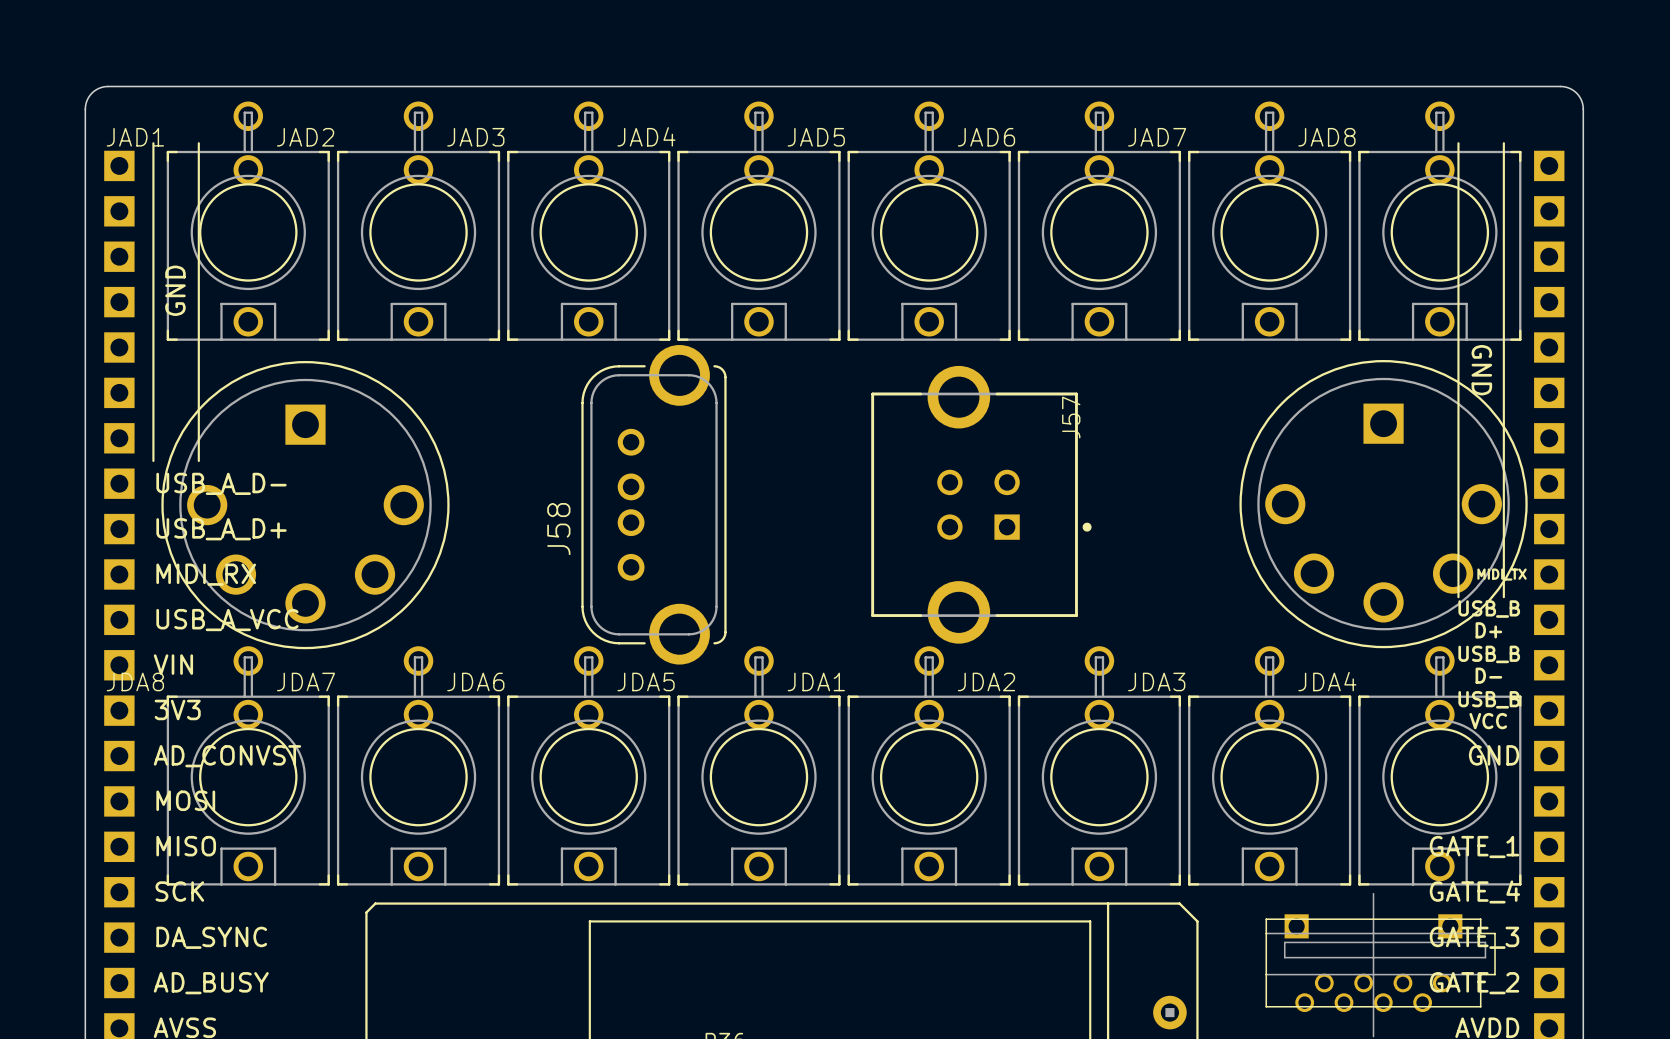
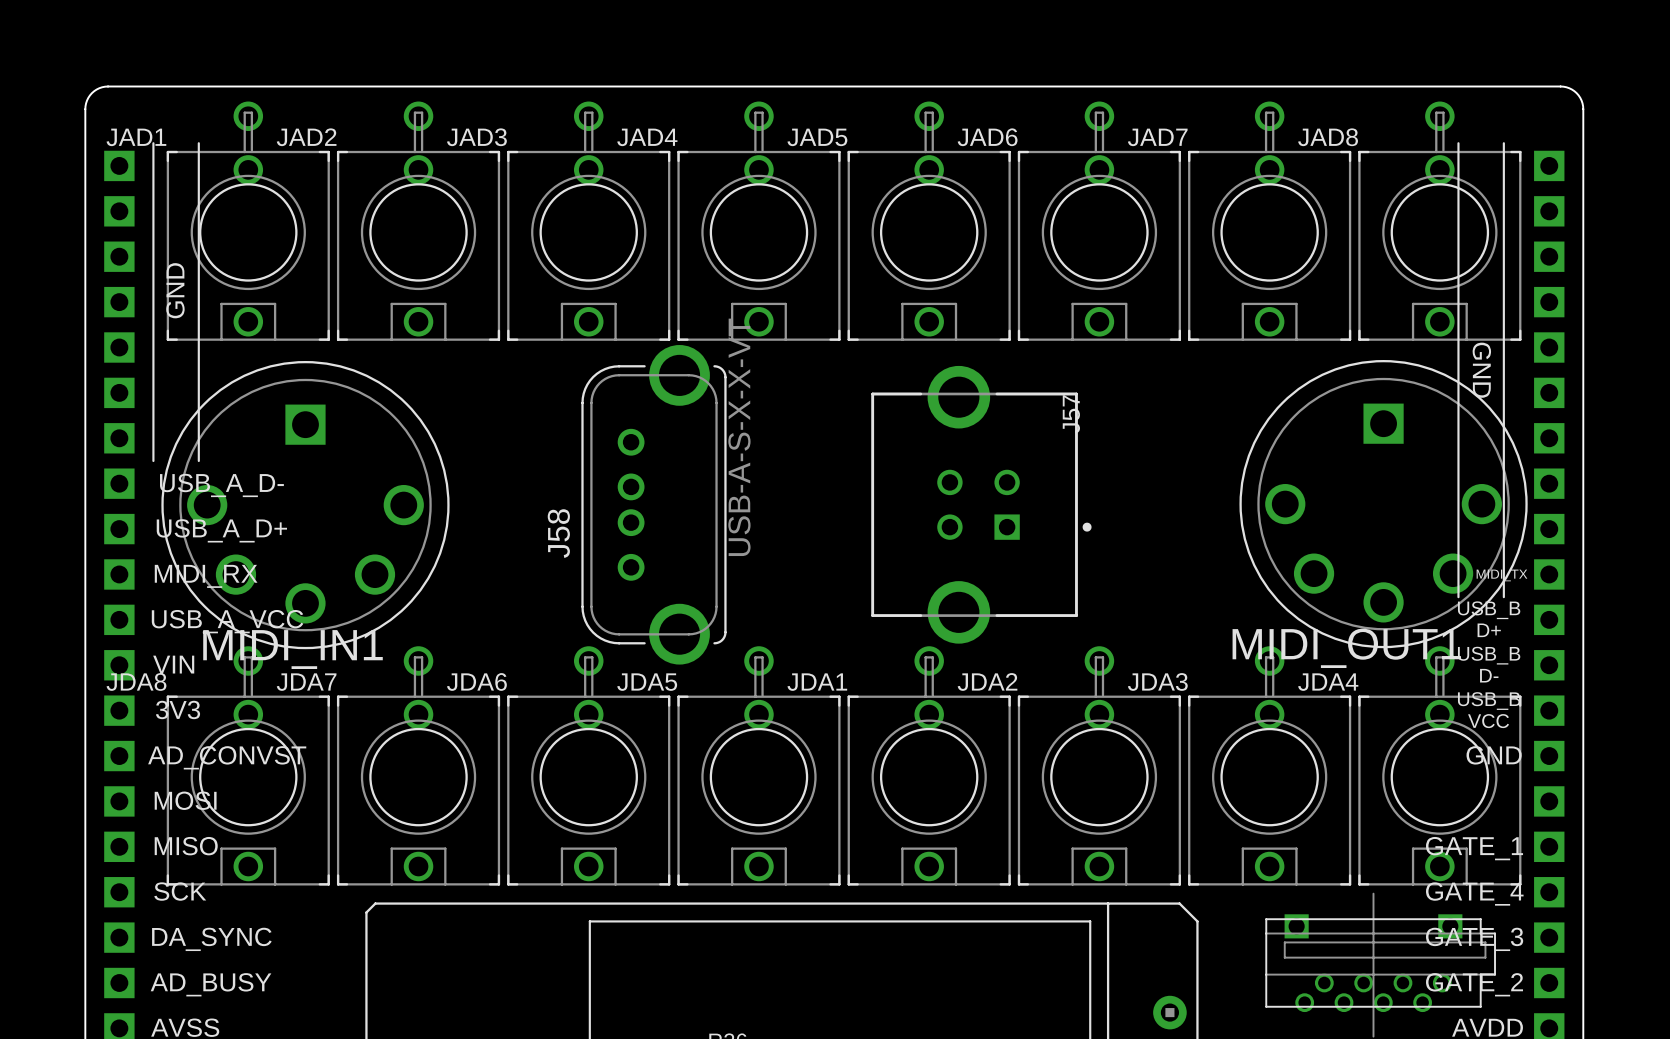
J58 value: none -> USB-A-S-X-X-VT (739, 437)
MIDI_OUT1 name: none -> MIDI_OUT1 (1346, 648)
MIDI_IN1 name: none -> MIDI_IN1 (293, 649)

